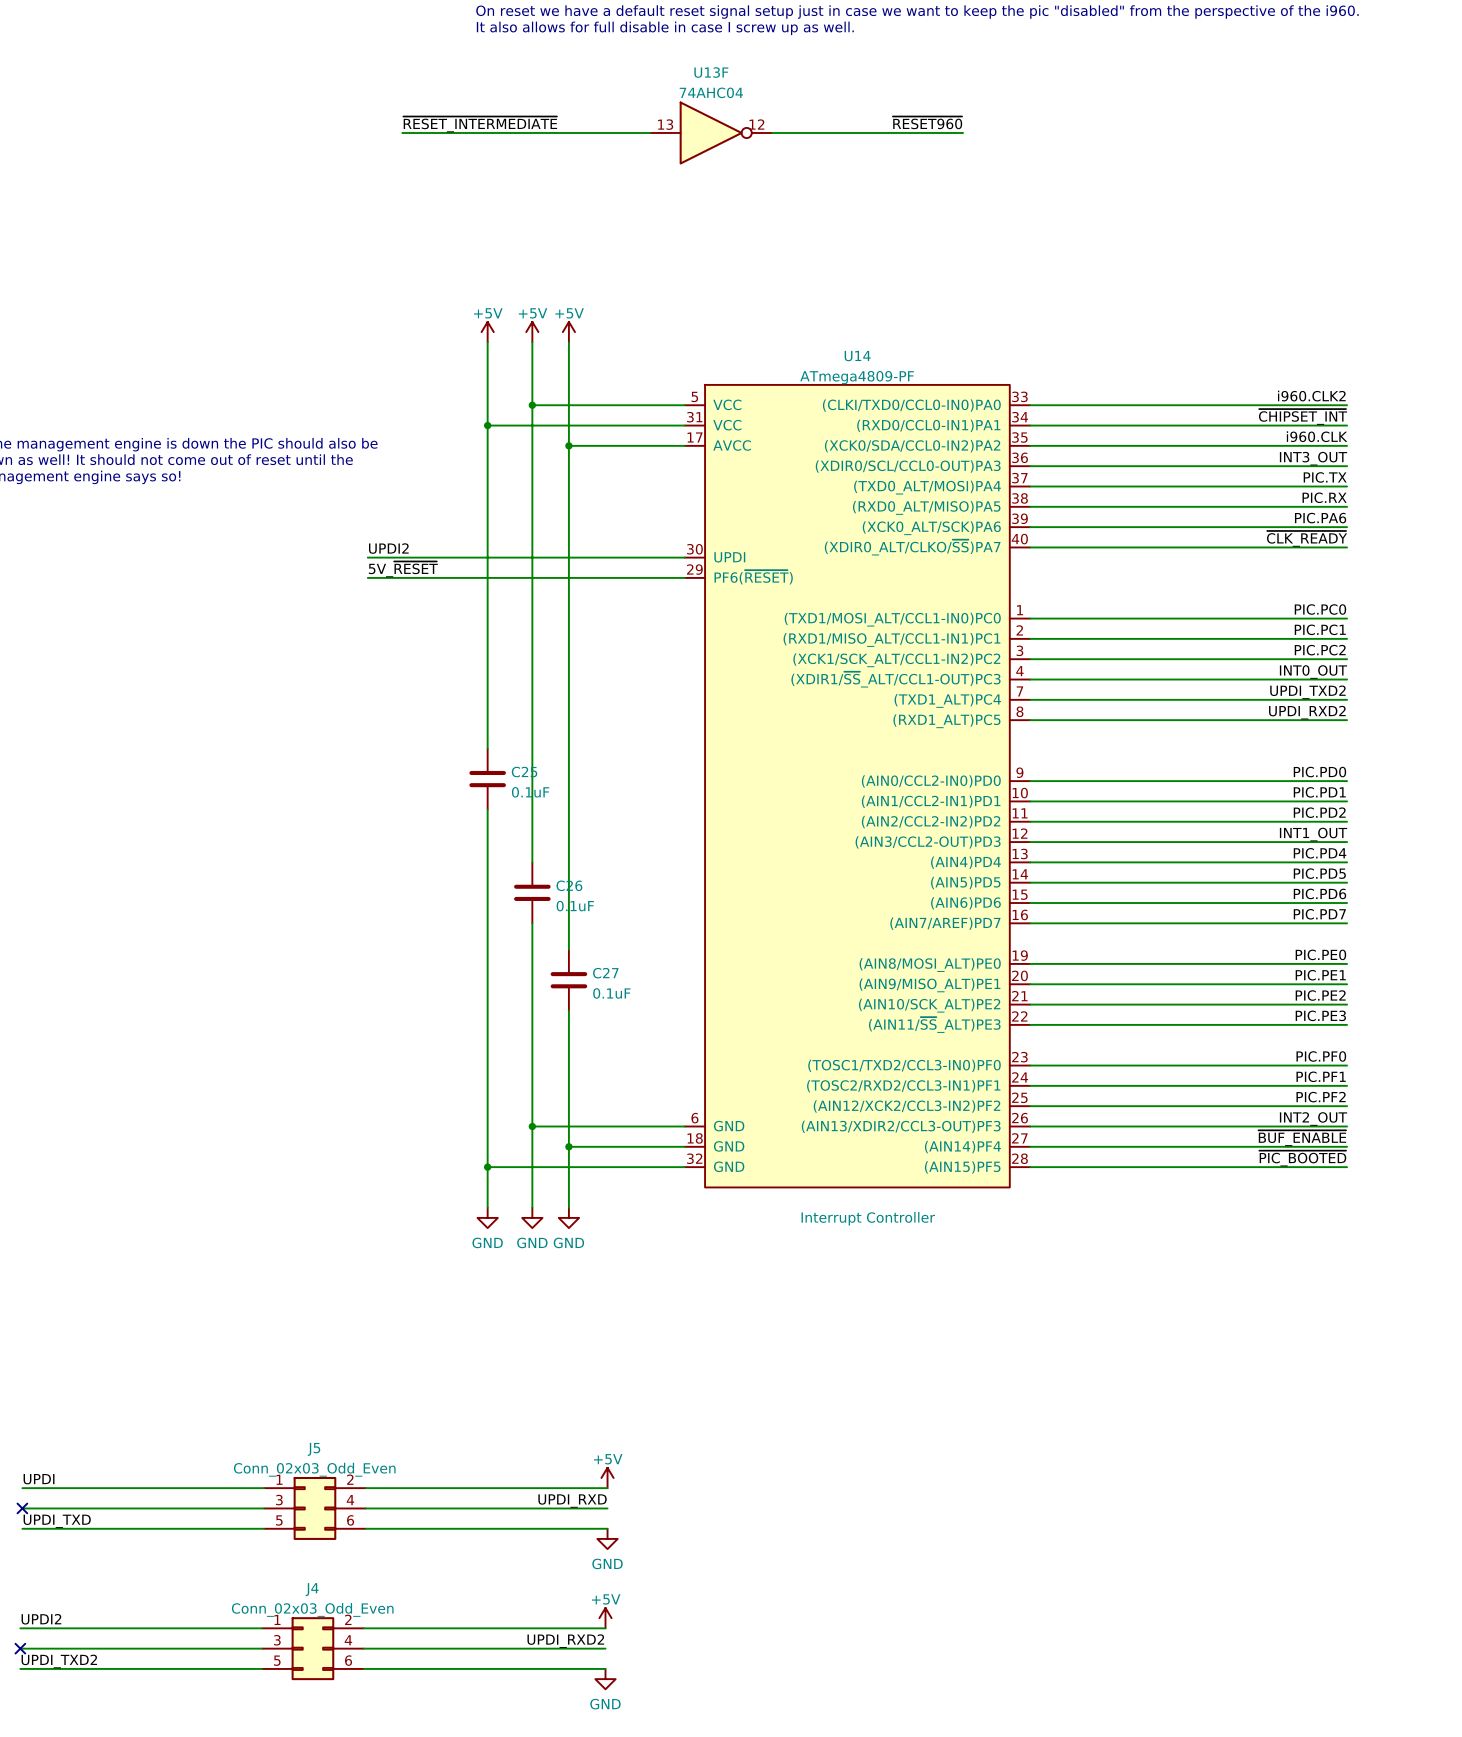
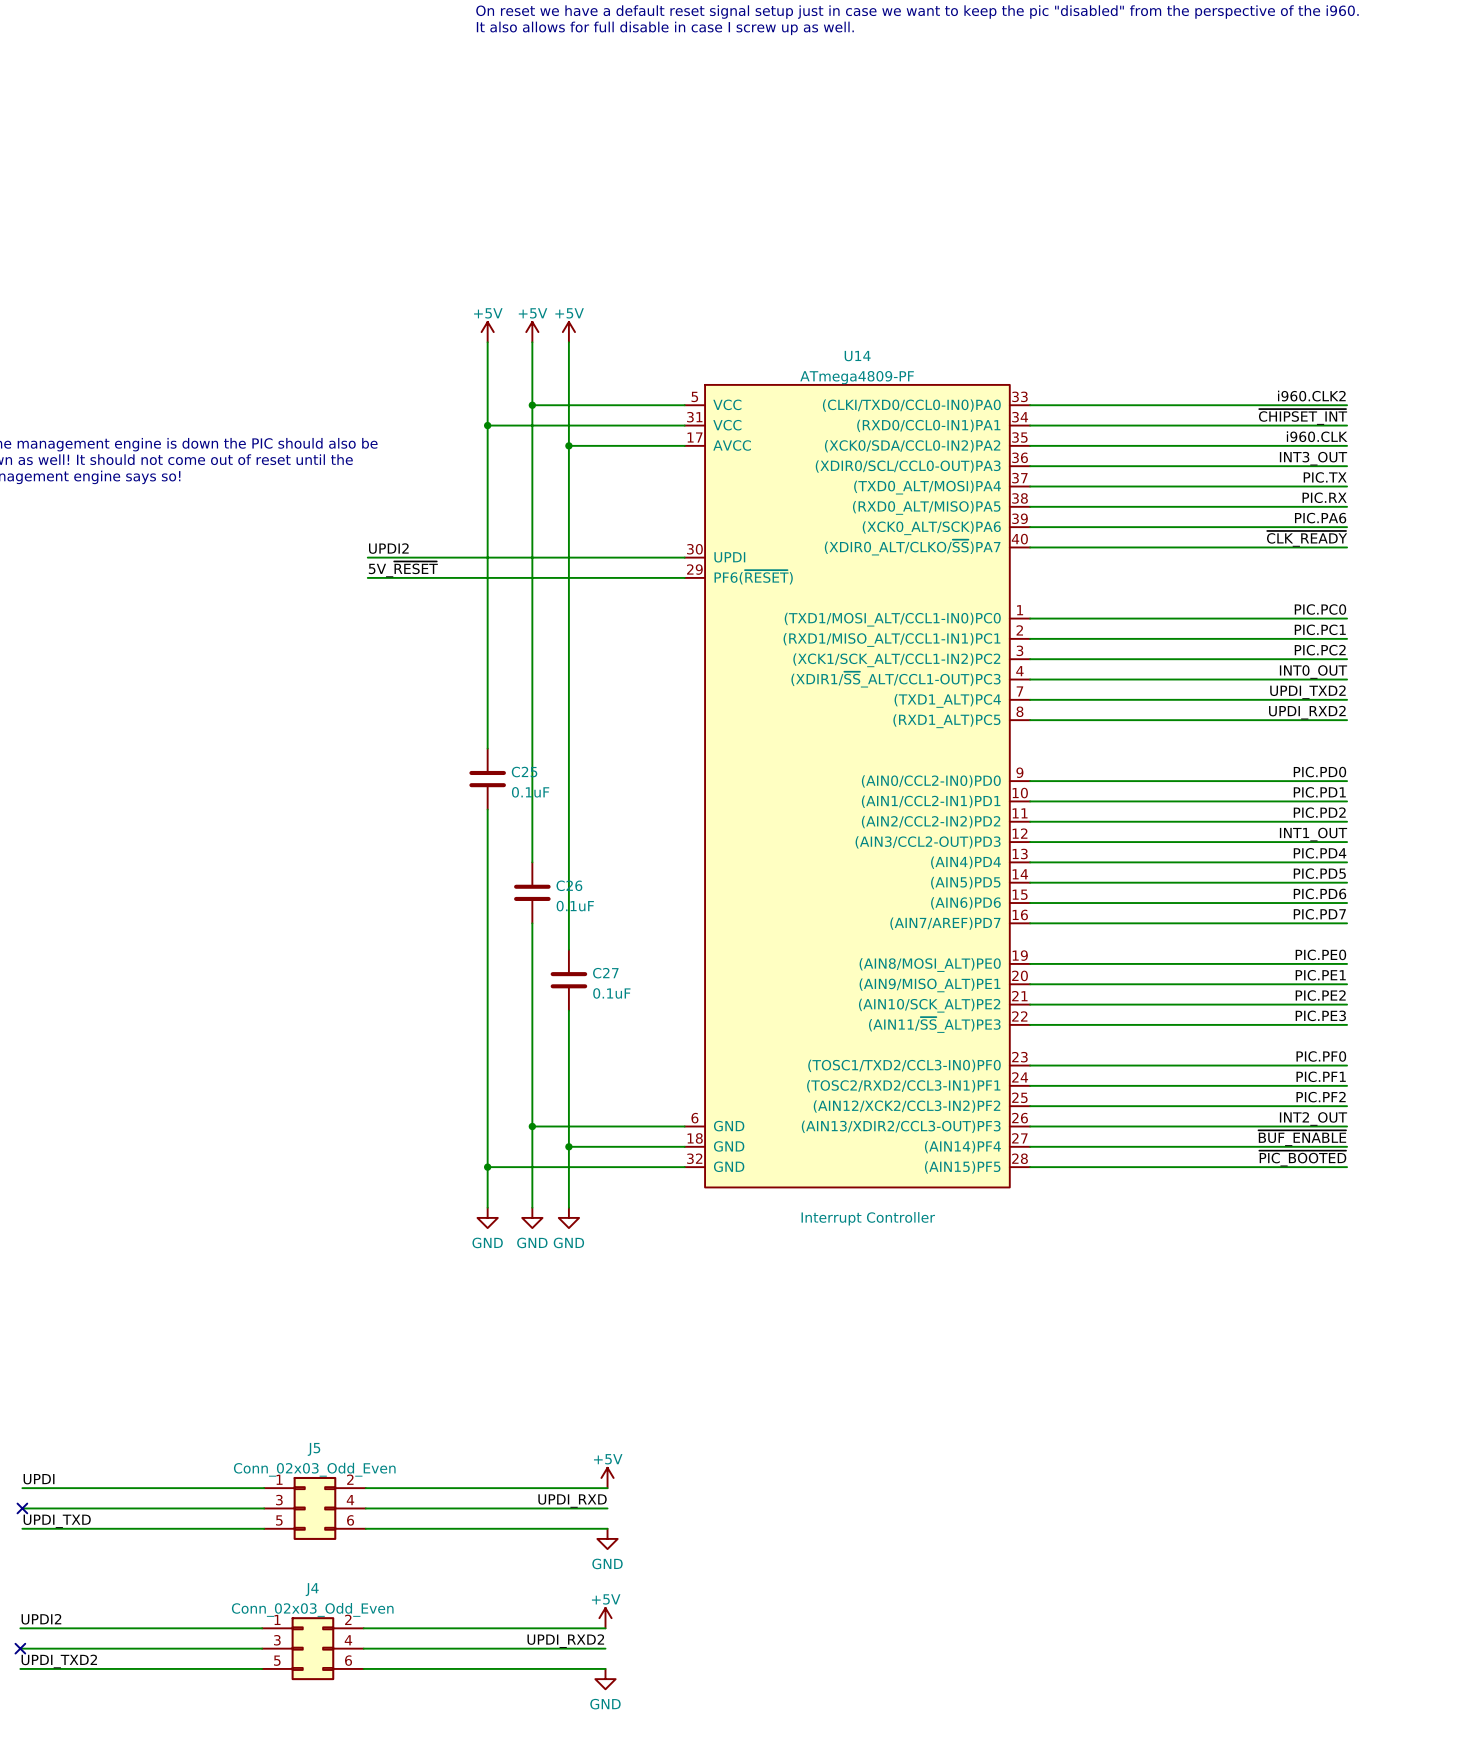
label: ~{RESET960} (927, 122) -> none
label: ~{RESET_INTERMEDIATE} (480, 124) -> none
wire: (402, 132) (650, 132) -> none
U13F: 74AHC04 (711, 132) -> none
wire: (772, 132) (963, 132) -> none

